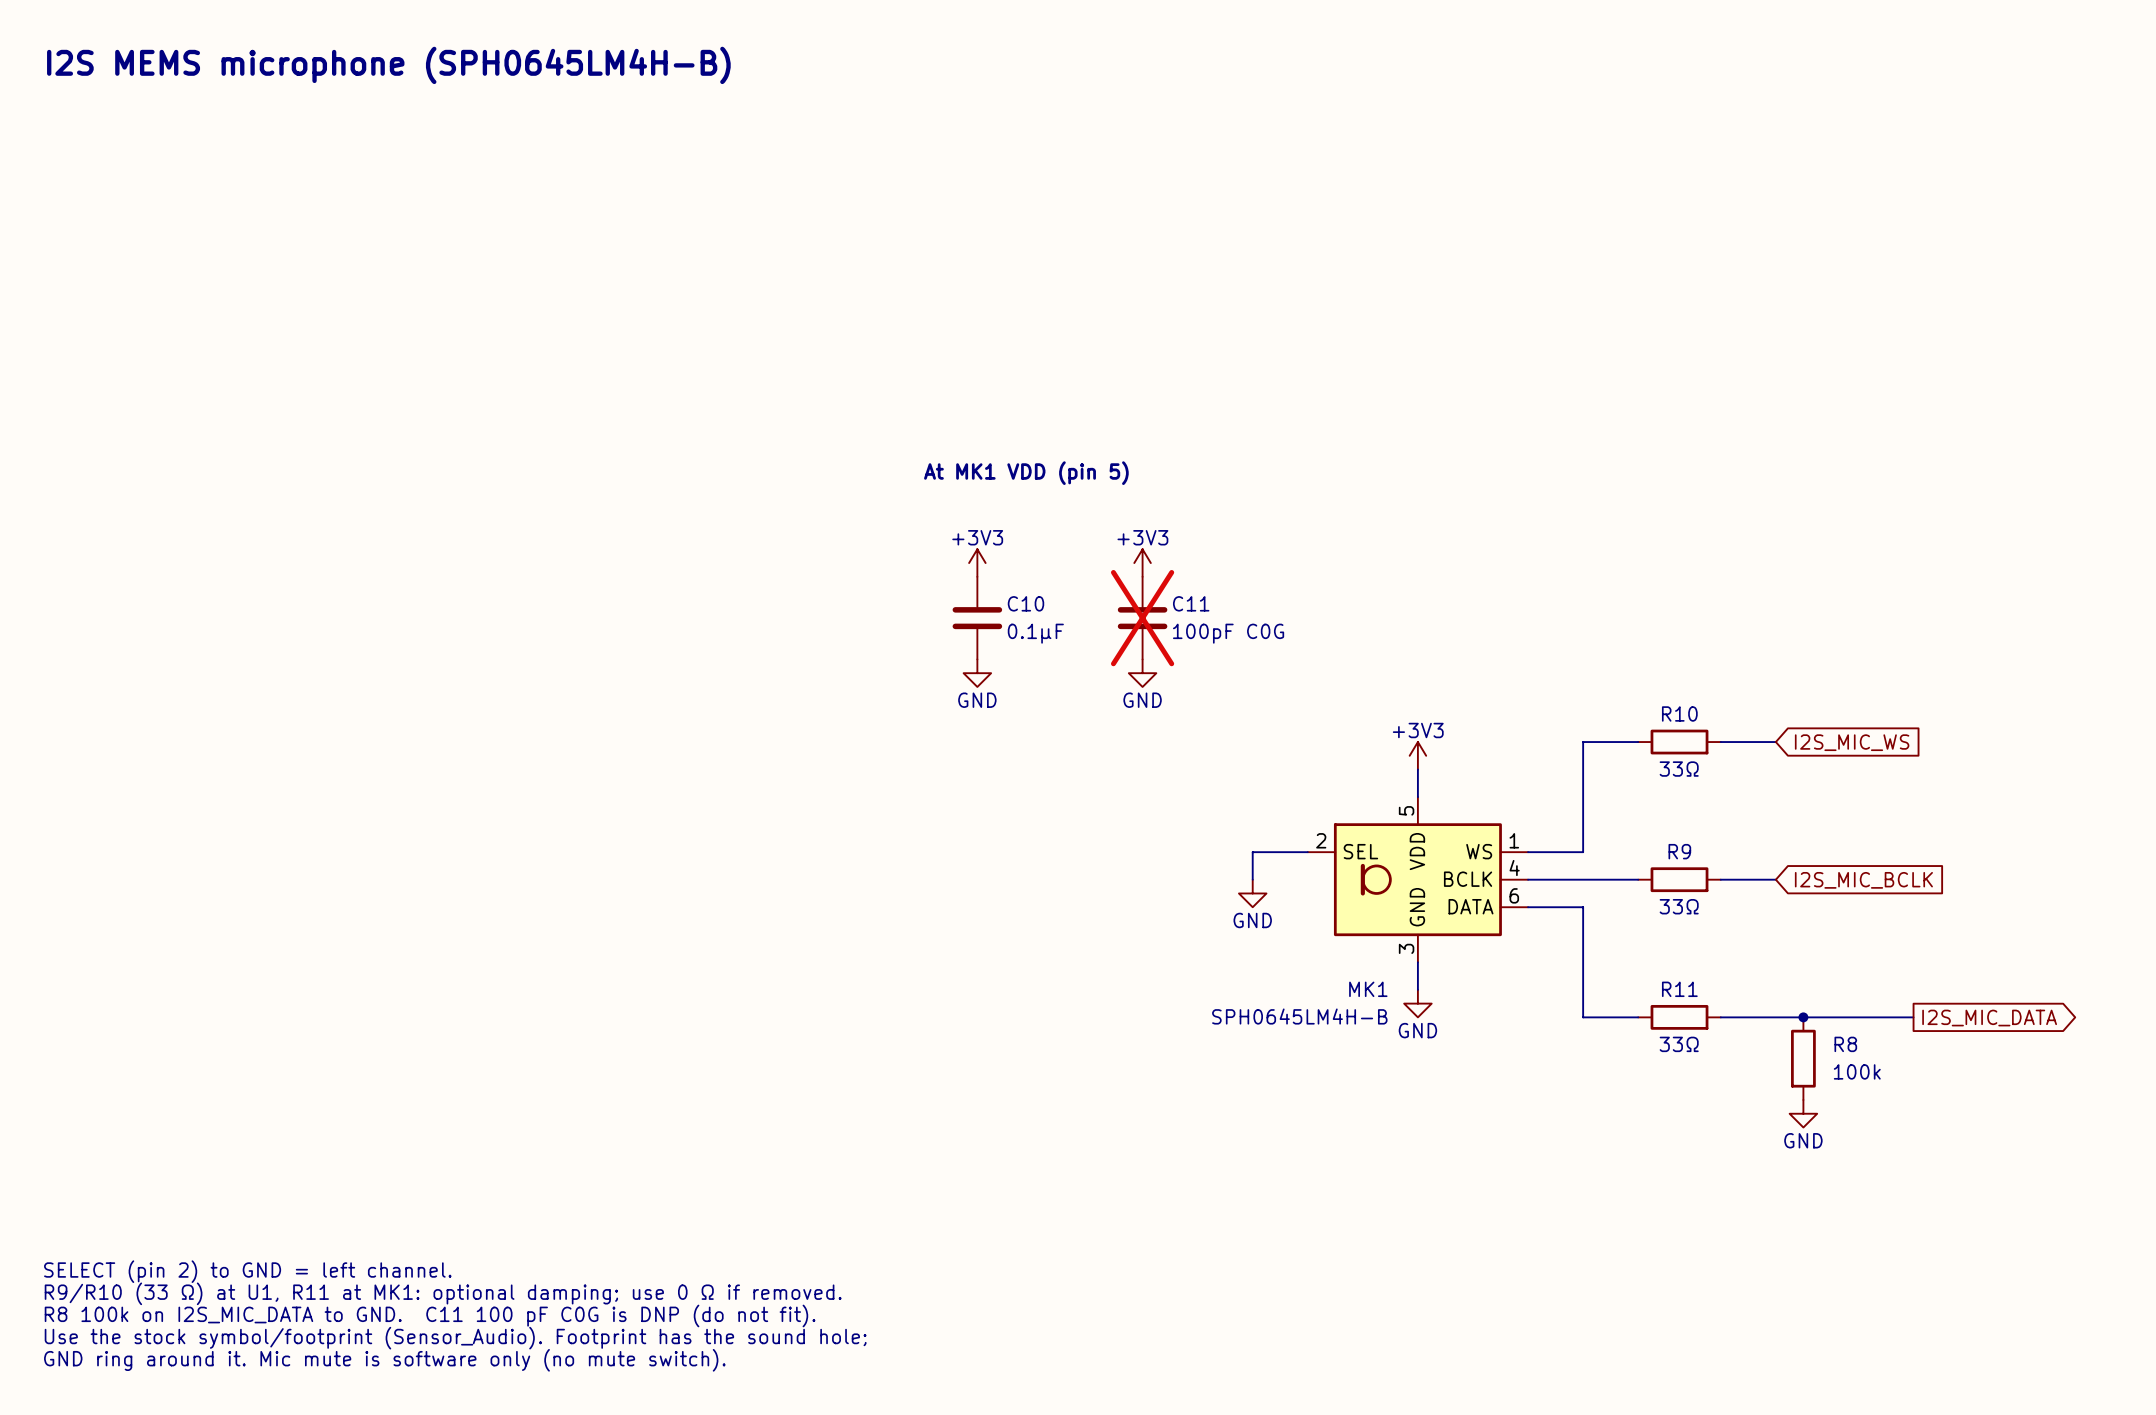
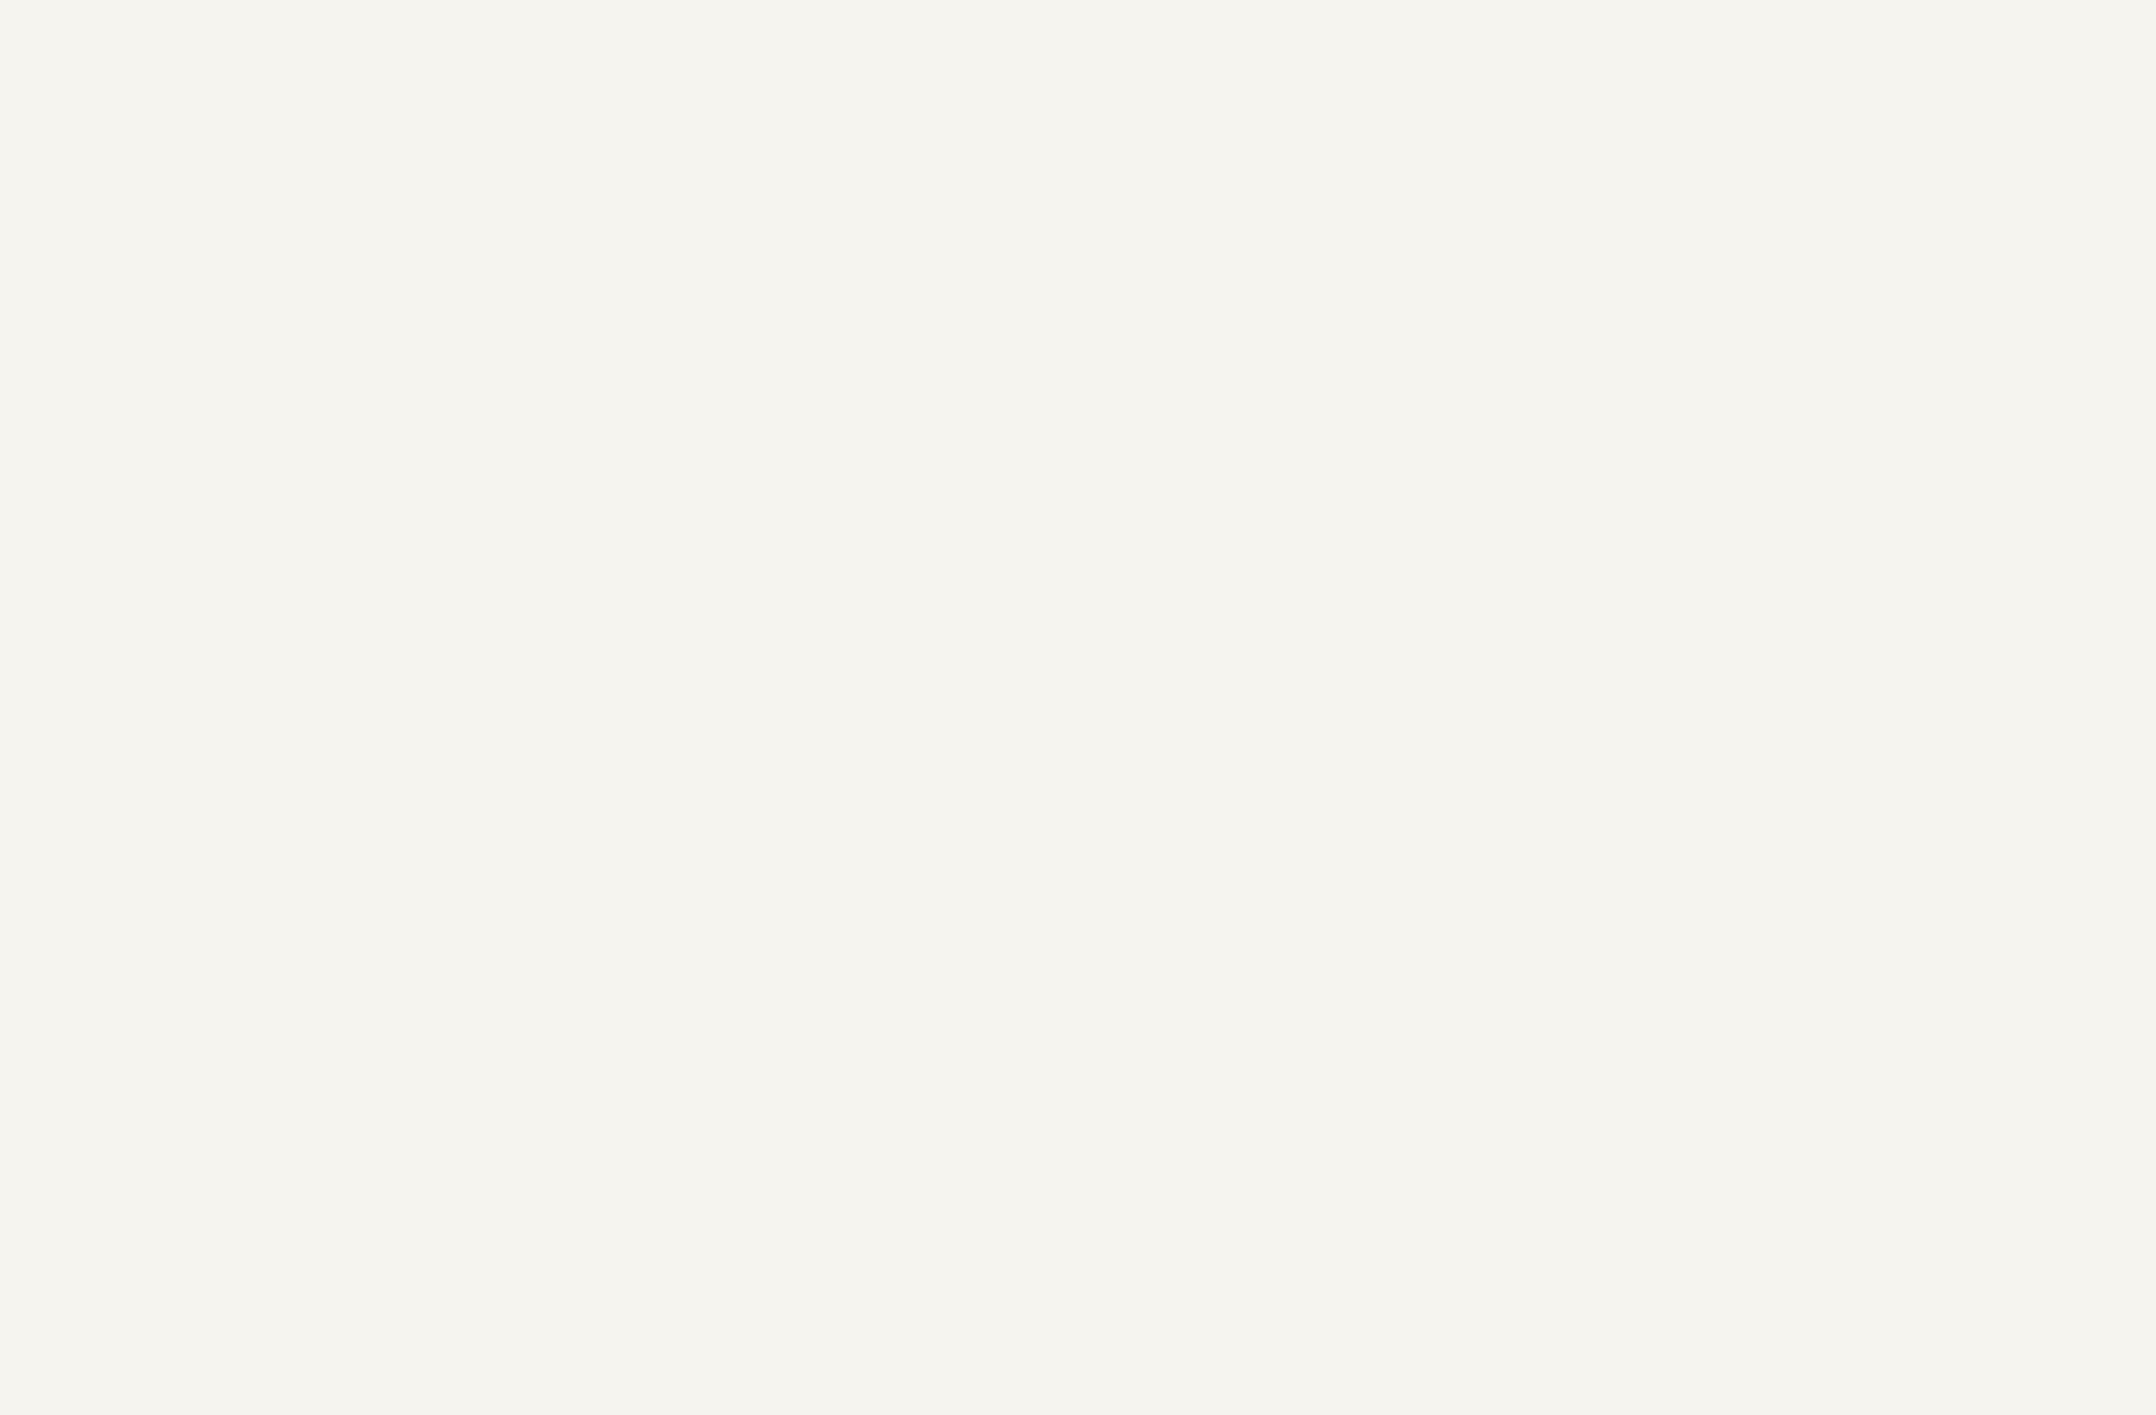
text: I2S MEMS microphone (SPH0645LM4H-B) (388, 65) -> none
text: At MK1 VDD (pin 5) (1026, 473) -> none
power symbol: +3V3 (977, 563) -> none
power symbol: +3V3 (1142, 563) -> none
C10: 0.1µF (977, 618) -> none
C11: 100pF C0G (1142, 618) -> none
power symbol: GND (977, 673) -> none
power symbol: GND (1142, 673) -> none
wire: (1638, 742) (1583, 742) (1583, 852) (1528, 852) -> none
R10: 33Ω (1679, 742) -> none
wire: (1720, 742) (1775, 742) -> none
global label: I2S_MIC_WS (1852, 742) -> none
power symbol: +3V3 (1417, 755) -> none
wire: (1417, 769) (1417, 797) -> none
wire: (1307, 852) (1252, 852) (1252, 879) -> none
MK1: SPH0645LM4H-B (1417, 879) -> none
wire: (1528, 879) (1638, 879) -> none
R9: 33Ω (1679, 879) -> none
wire: (1720, 879) (1775, 879) -> none
global label: I2S_MIC_BCLK (1863, 880) -> none
power symbol: GND (1252, 893) -> none
wire: (1528, 907) (1583, 907) (1583, 1017) (1638, 1017) -> none
wire: (1417, 962) (1417, 989) -> none
power symbol: GND (1417, 1003) -> none
R11: 33Ω (1679, 1017) -> none
wire: (1720, 1017) (1913, 1017) -> none
junction: (1803, 1017) -> none
global label: I2S_MIC_DATA (1989, 1018) -> none
R8: 100k (1803, 1058) -> none
power symbol: GND (1803, 1113) -> none
text: SELECT (pin 2) to GND = left channel. (247, 1271) -> none
text: R9/R10 (33 Ω) at U1, R11 at MK1: optional damping; use 0 Ω if removed. (443, 1293) -> none
text: R8 100k on I2S_MIC_DATA to GND. C11 100 pF C0G is DNP (do not fit). (430, 1315) -> none
text: Use the stock symbol/footprint (Sensor_Audio). Footprint has the sound hole; (455, 1338) -> none
text: GND ring around it. Mic mute is software only (no mute switch). (384, 1360) -> none

